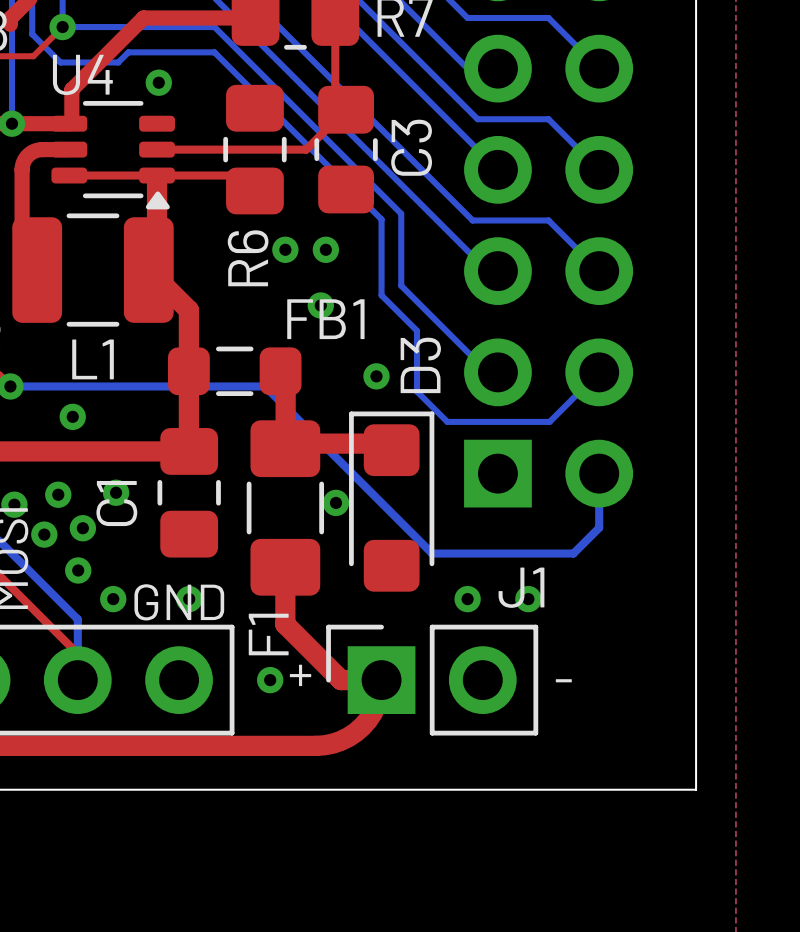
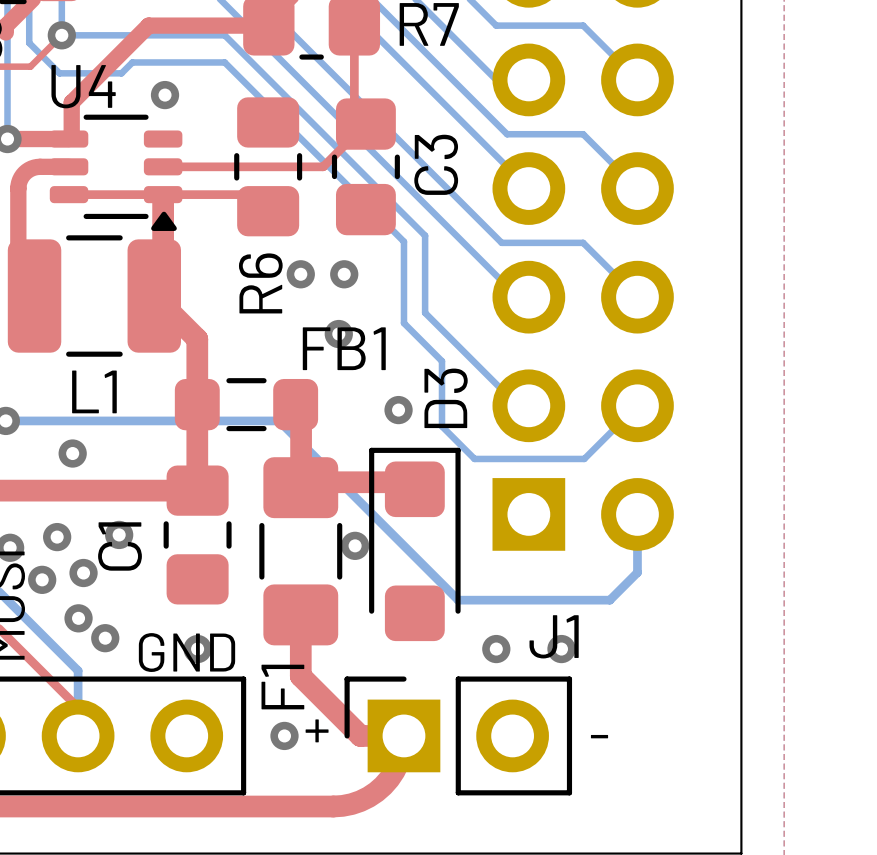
via position: (113, 599) -> (105, 638)

